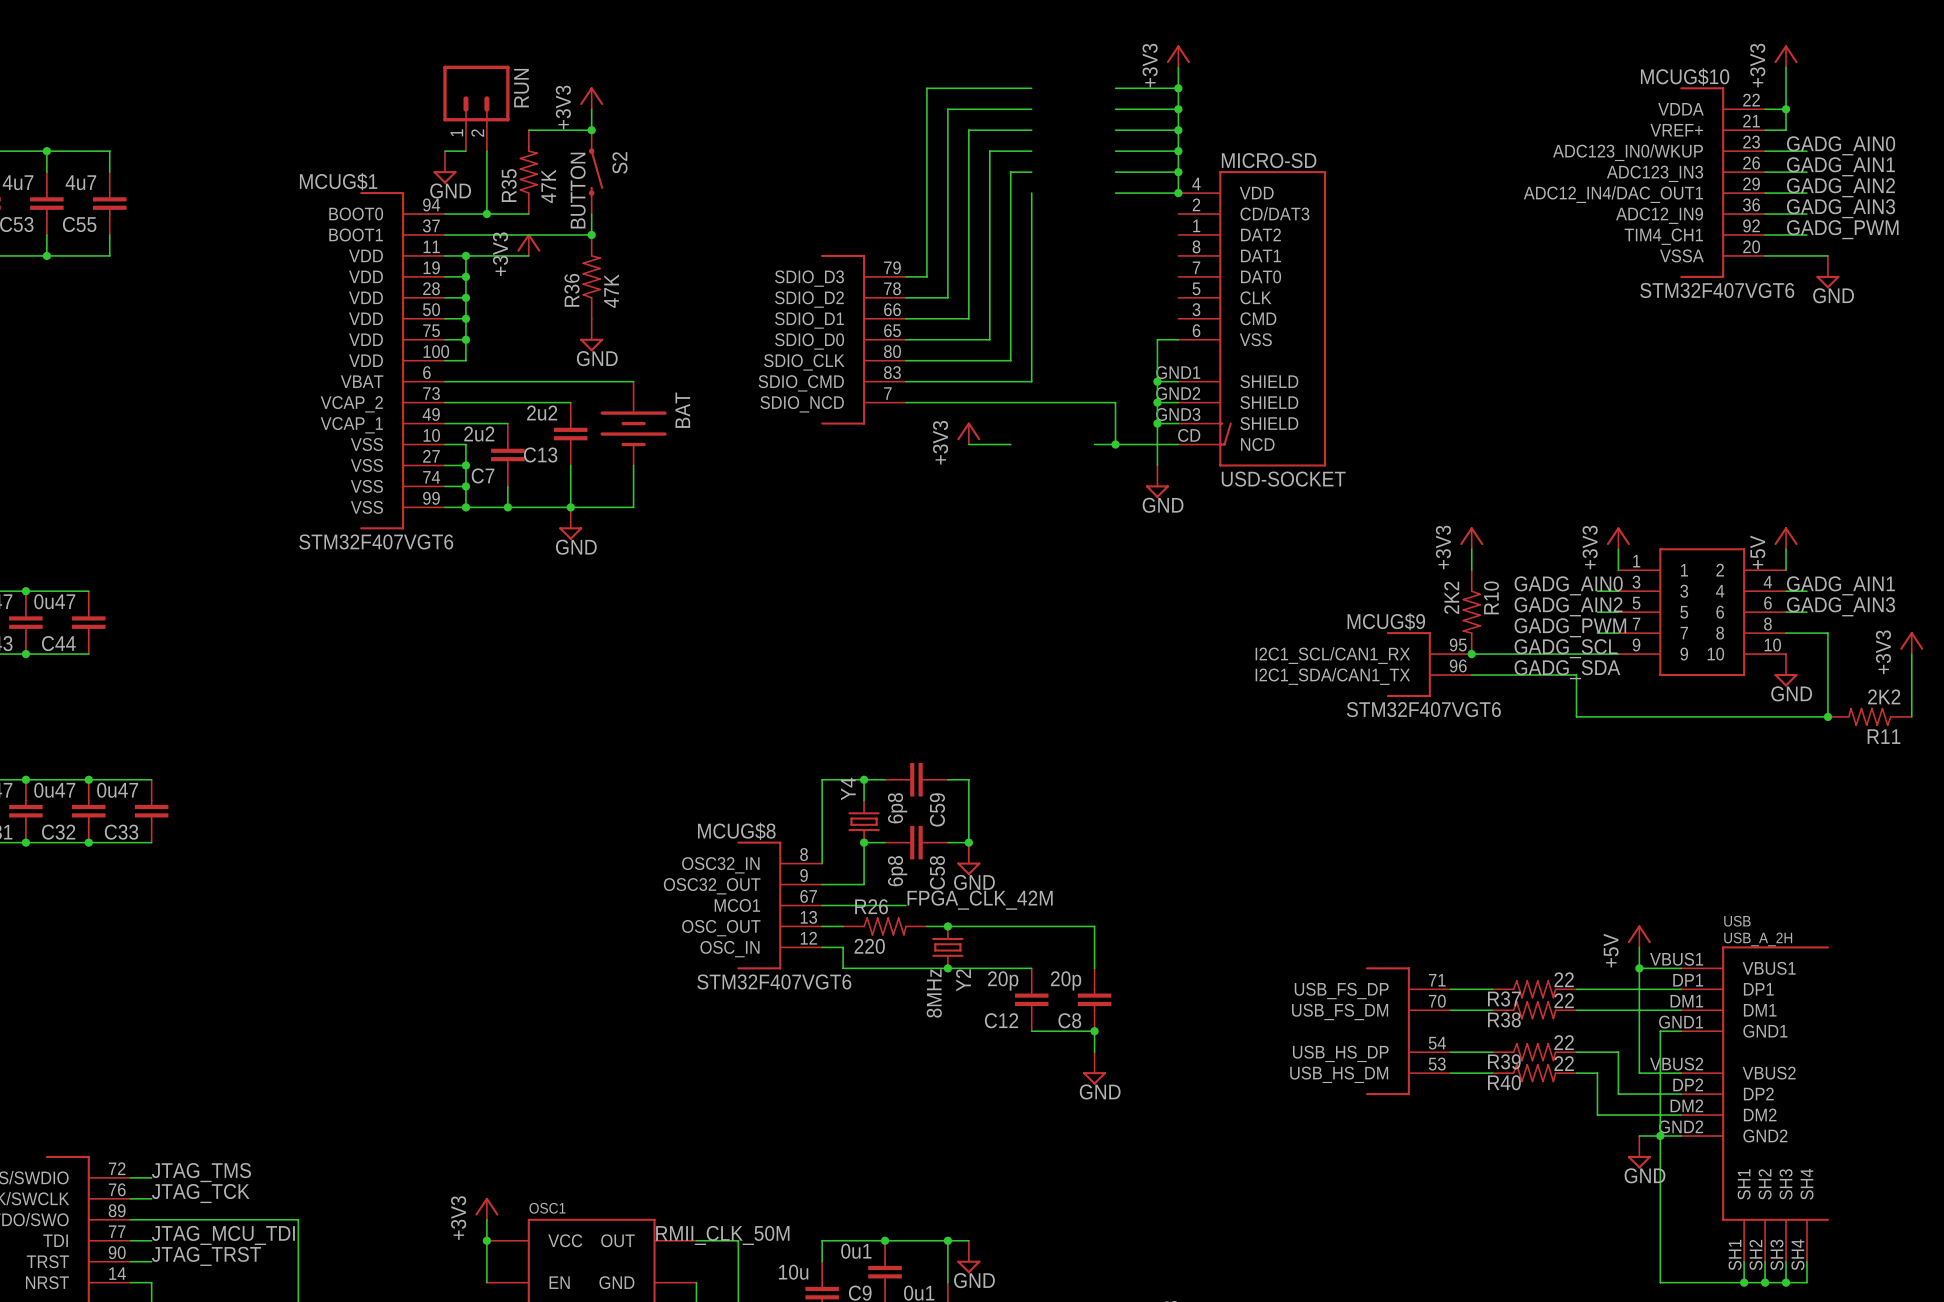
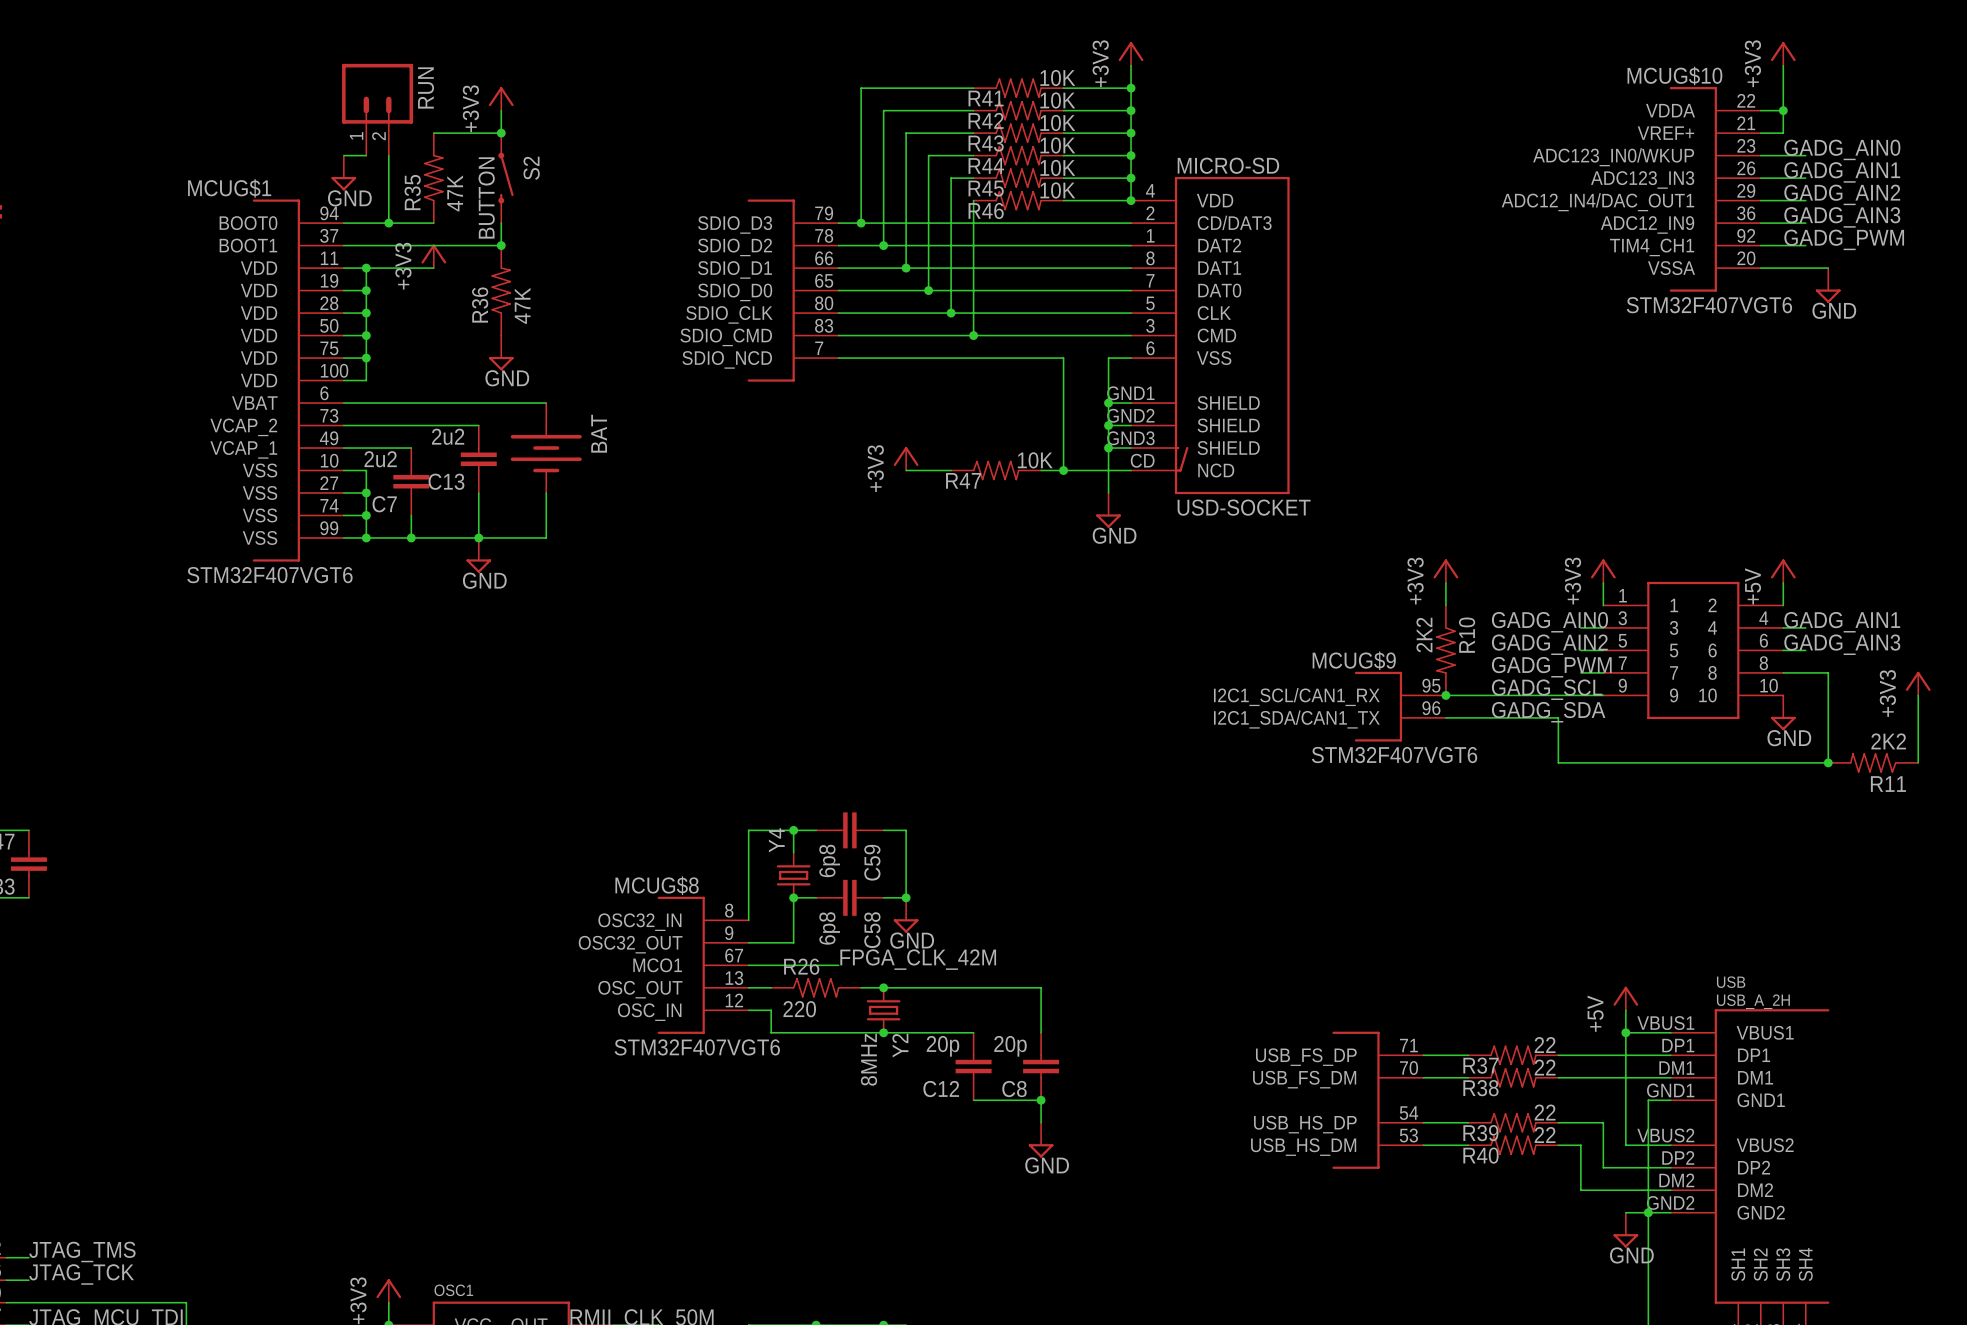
R41: none -> 10K (1018, 88)
R42: none -> 10K (1018, 110)
R43: none -> 10K (1018, 133)
R44: none -> 10K (1018, 155)
R45: none -> 10K (1018, 178)
R46: none -> 10K (1018, 200)
wire: none -> (838, 223) (1131, 223)
wire: (926, 214) (926, 276) -> (1131, 290) (861, 290)
junction: none -> (861, 223)
wire: none -> (838, 245) (1131, 245)
wire: (947, 234) (947, 297) -> (1131, 313) (883, 313)
junction: none -> (883, 245)
wire: none -> (838, 268) (1131, 268)
wire: (968, 255) (968, 318) -> (1131, 335) (906, 335)
junction: none -> (906, 268)
wire: (989, 276) (989, 339) -> none
junction: none -> (928, 290)
wire: (1010, 297) (1010, 360) (905, 360) -> none
junction: none -> (951, 313)
wire: (1031, 318) (1031, 381) (905, 381) -> none
junction: none -> (973, 335)
part position: (863, 339) -> (793, 290)
wire: (905, 402) (1115, 402) -> (928, 358) (1063, 358) (1063, 425)
R47: none -> 10K (996, 470)

